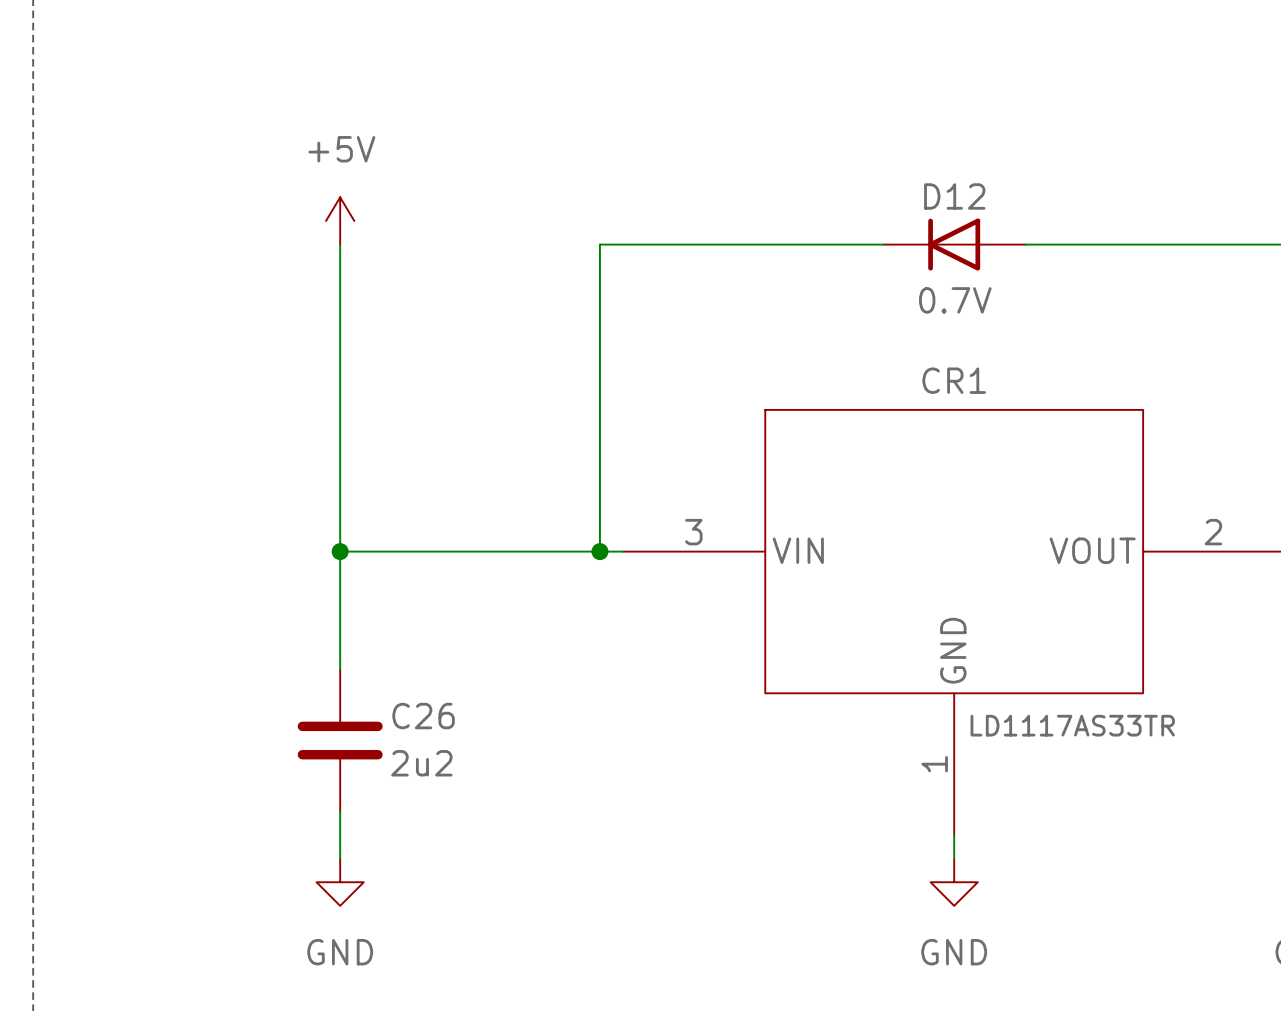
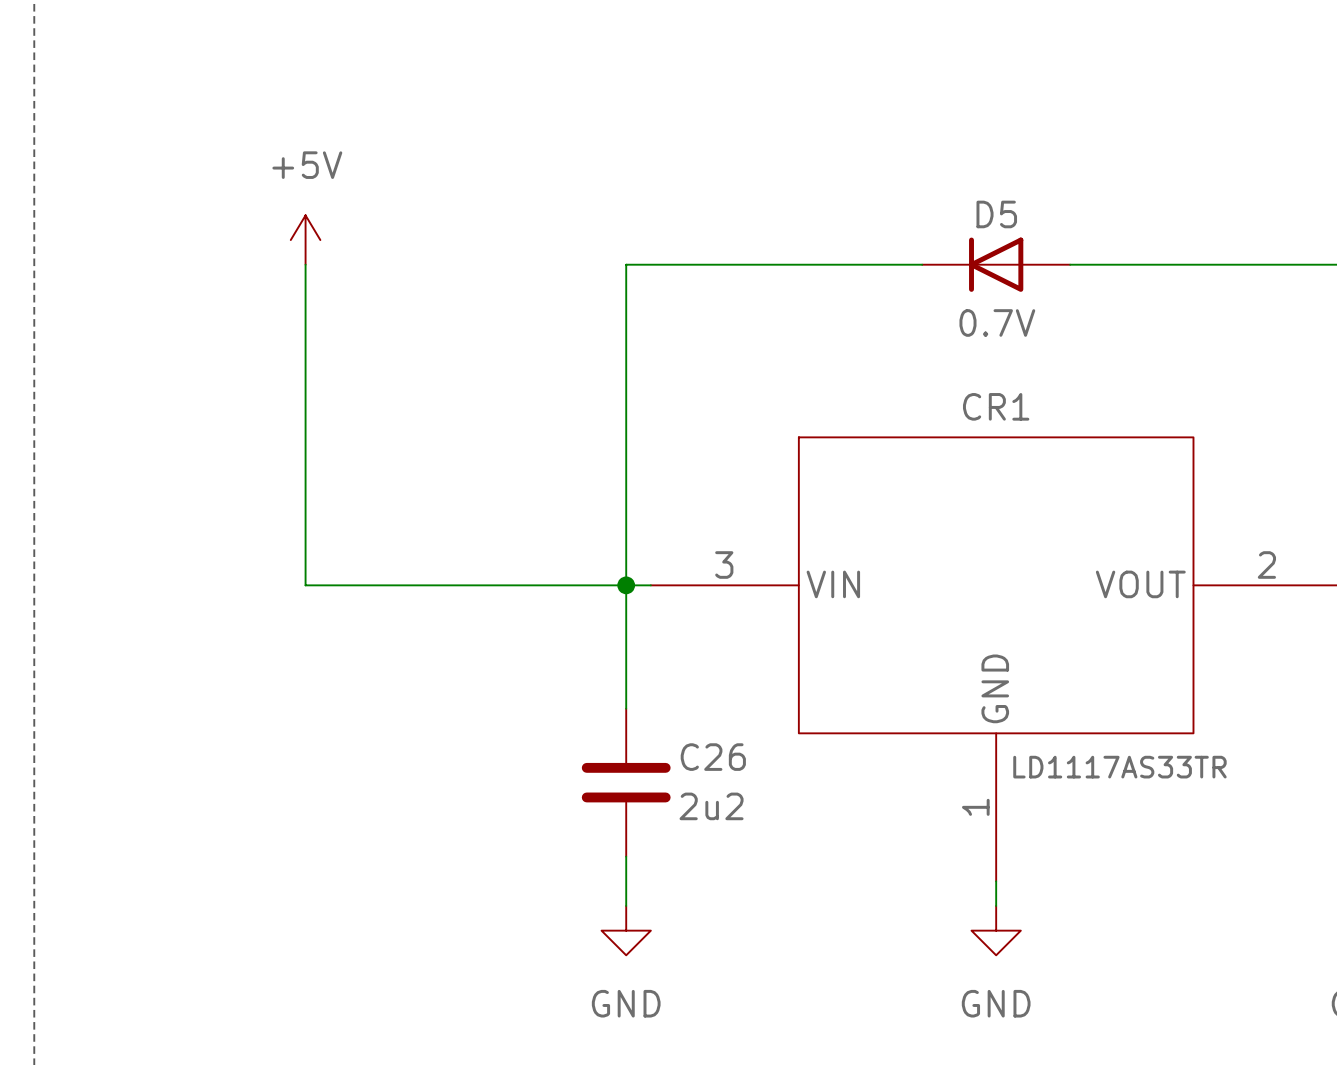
D12 name: D12 (954, 196) -> D5 (996, 214)
power symbol position: +5V (340, 220) -> +5V (305, 240)
wire: none -> (305, 264) (305, 585) (354, 585)
wire: (340, 244) (340, 669) -> none
junction: (340, 551) -> none
wire: none -> (626, 585) (626, 708)
C26 position: (340, 740) -> (626, 782)
wire: (340, 811) (340, 858) -> (626, 856) (626, 905)
power symbol position: GND (340, 882) -> GND (626, 930)

